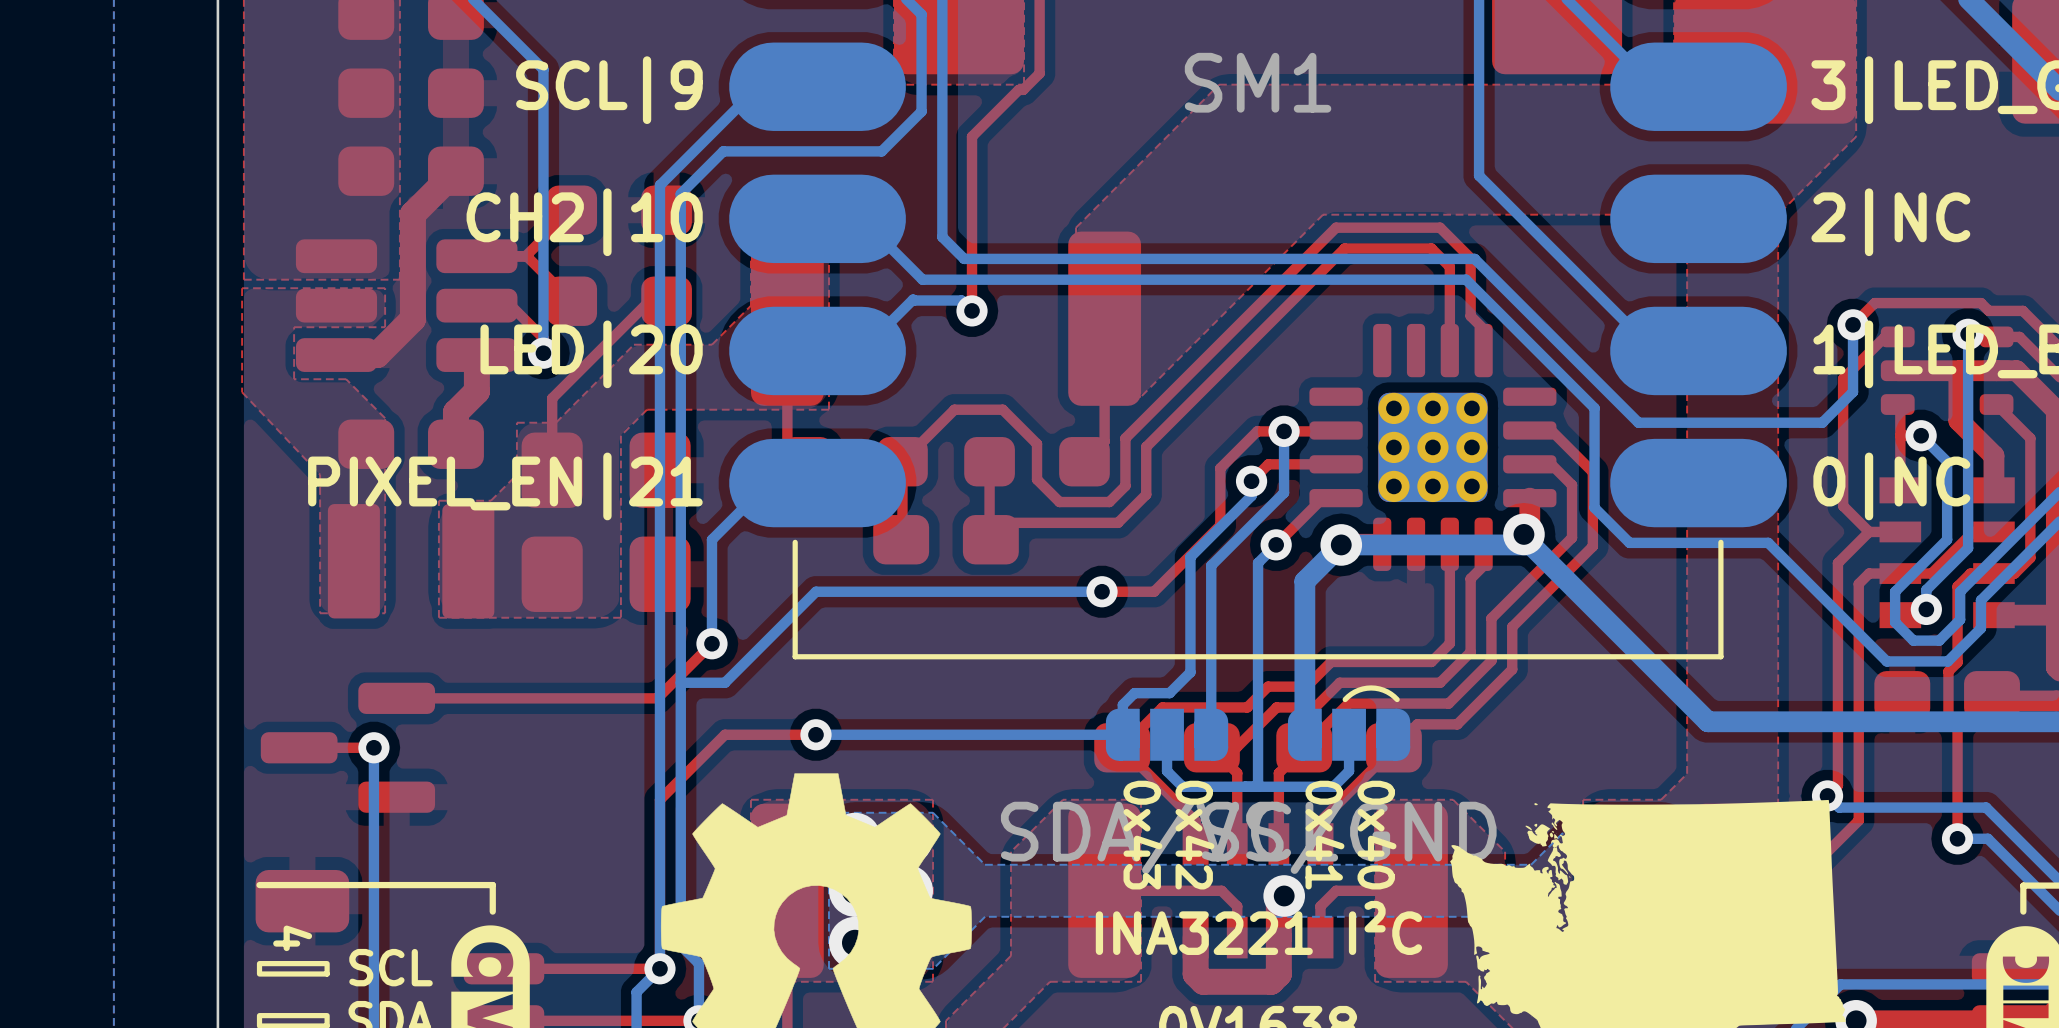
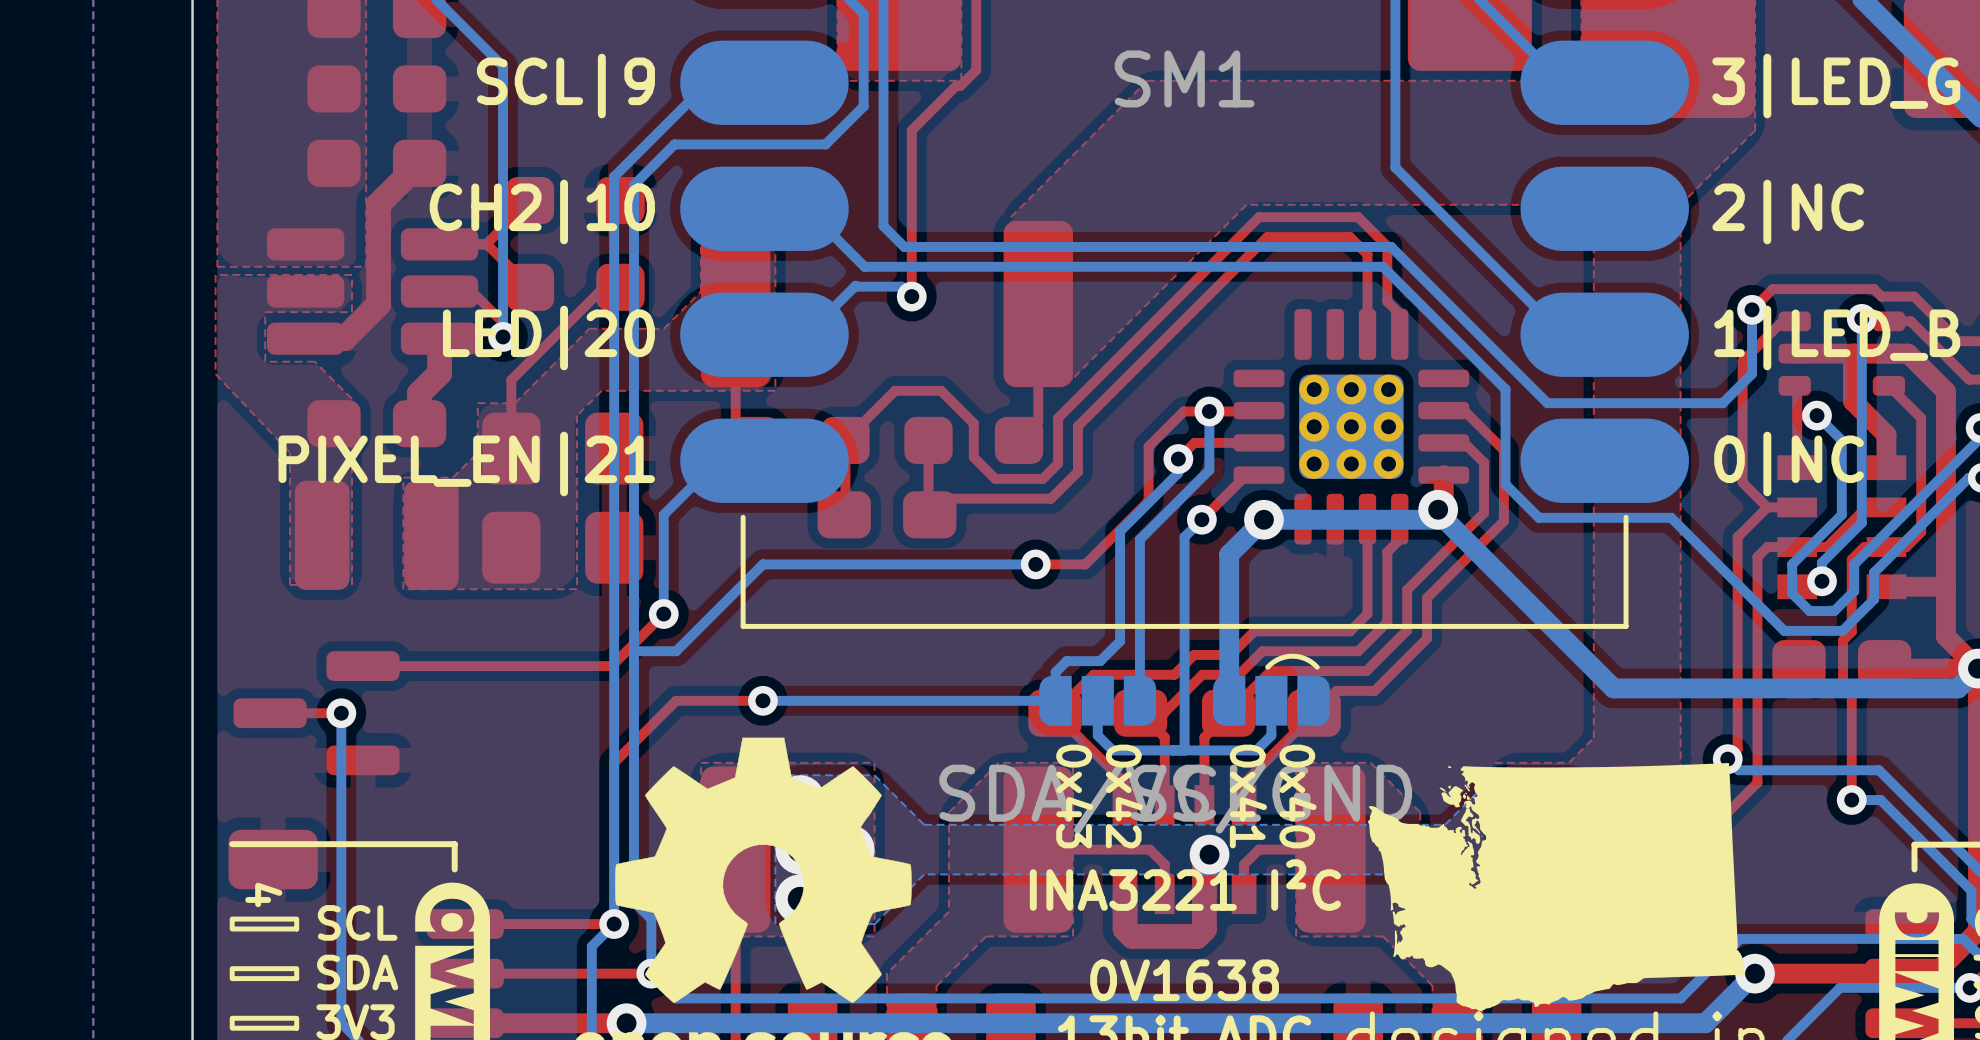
part footprint: [327, 504, 495, 619] -> [294, 480, 459, 590]

